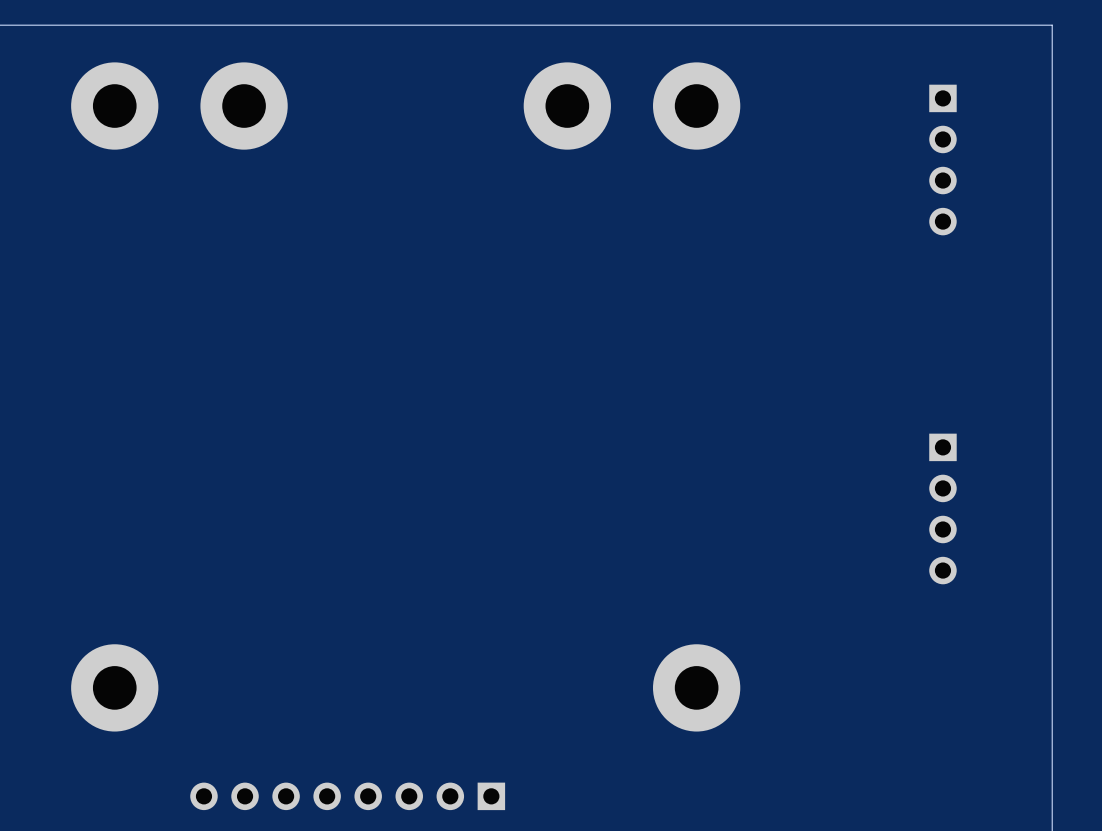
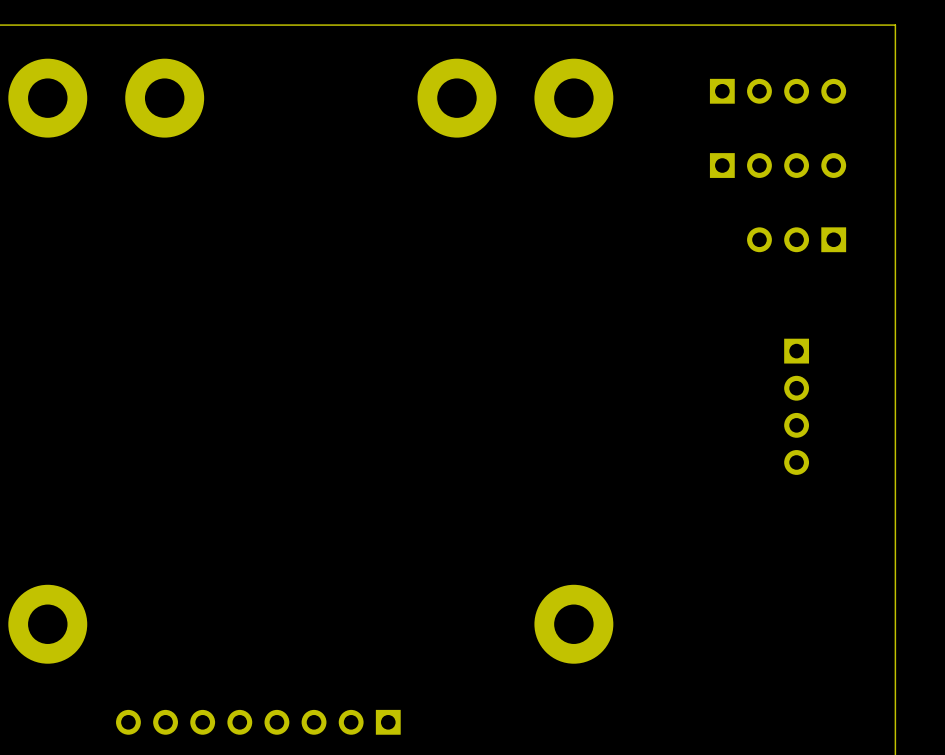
part: none -> (778, 91)
part rotation: 0° (942, 160) -> 90° counterclockwise (778, 165)
part: none -> (796, 239)
part position: (942, 508) -> (796, 406)

